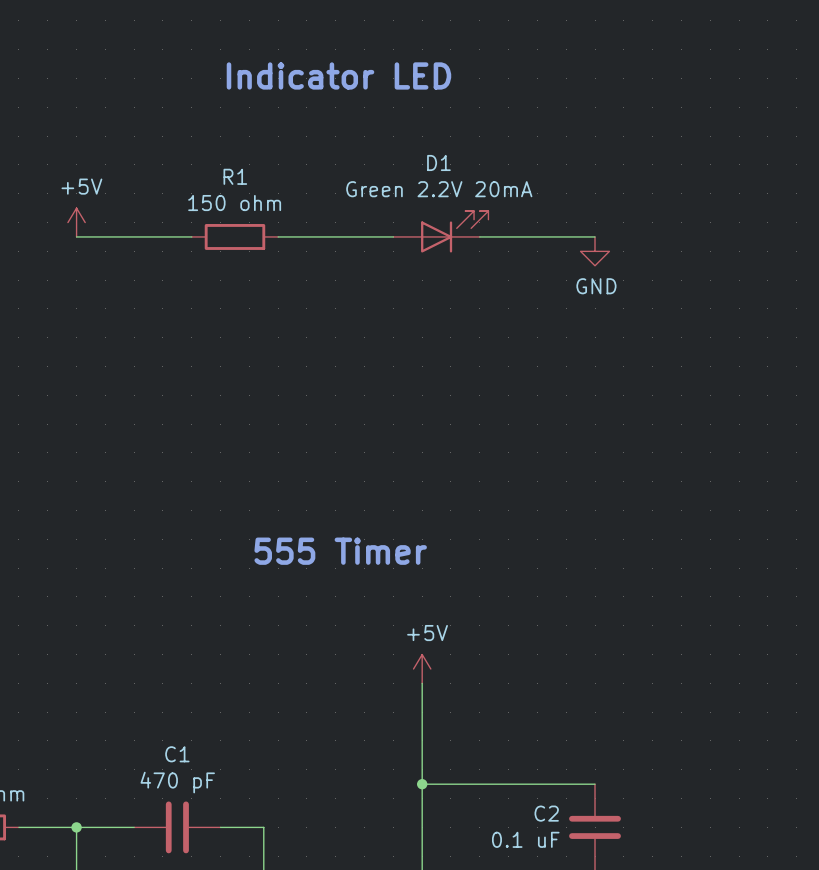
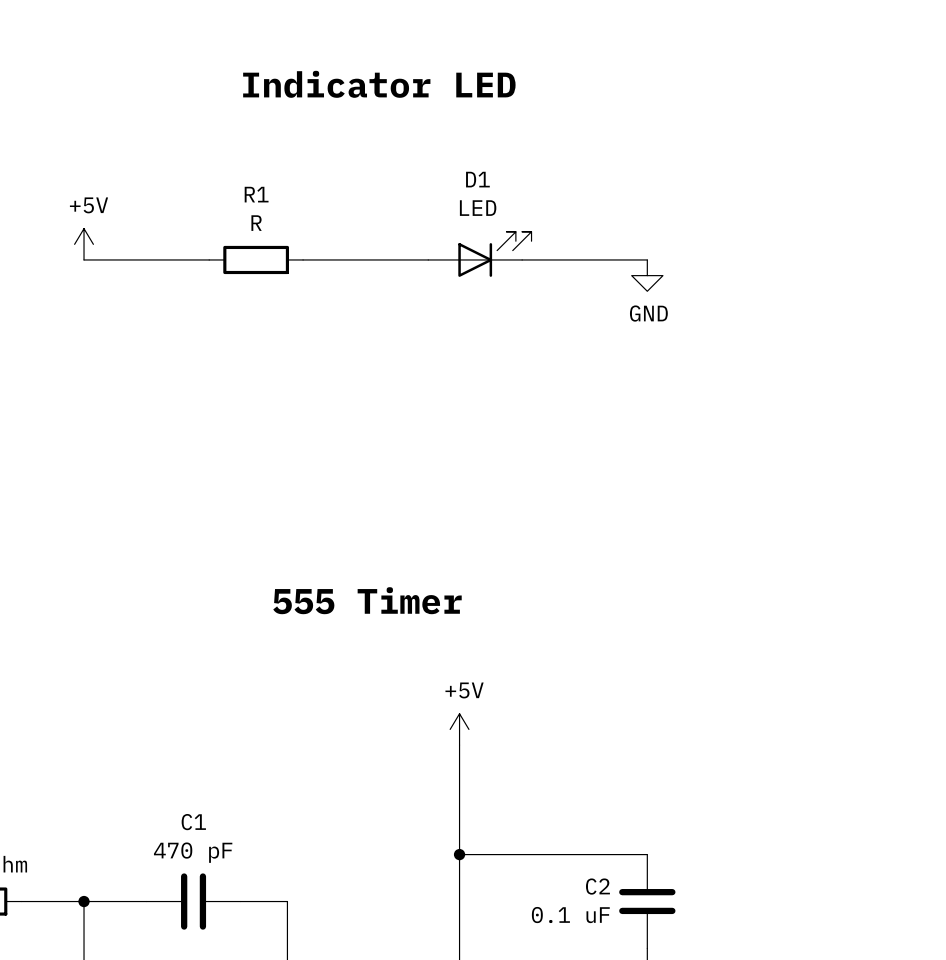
D1 value: Green 2.2V 20mA (439, 189) -> LED (478, 208)
R1 value: 150 ohm (234, 203) -> R (256, 223)

